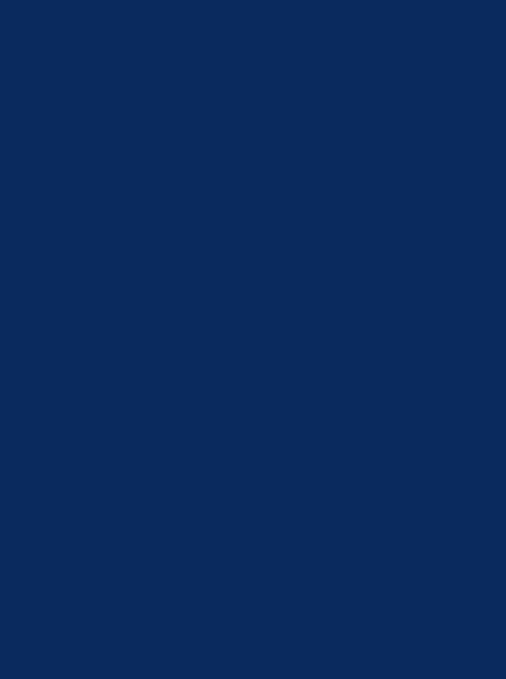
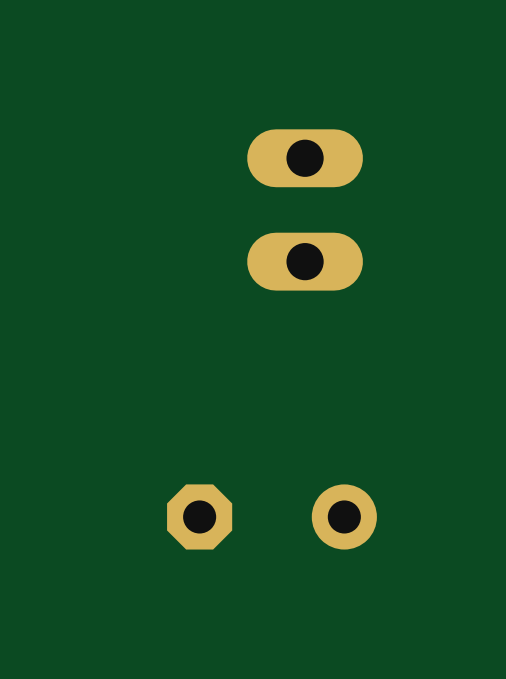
part: none -> (305, 209)
part: none -> (271, 516)

